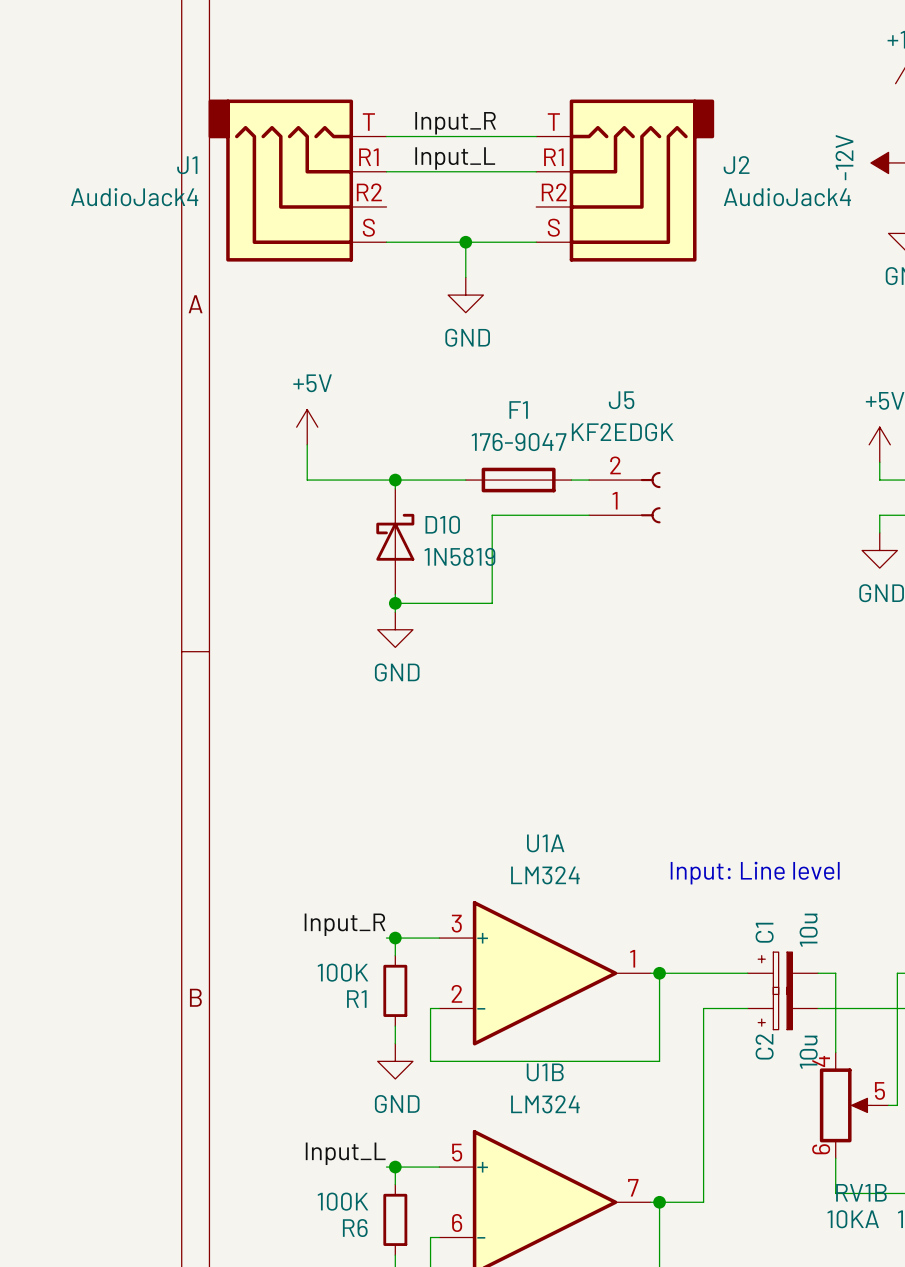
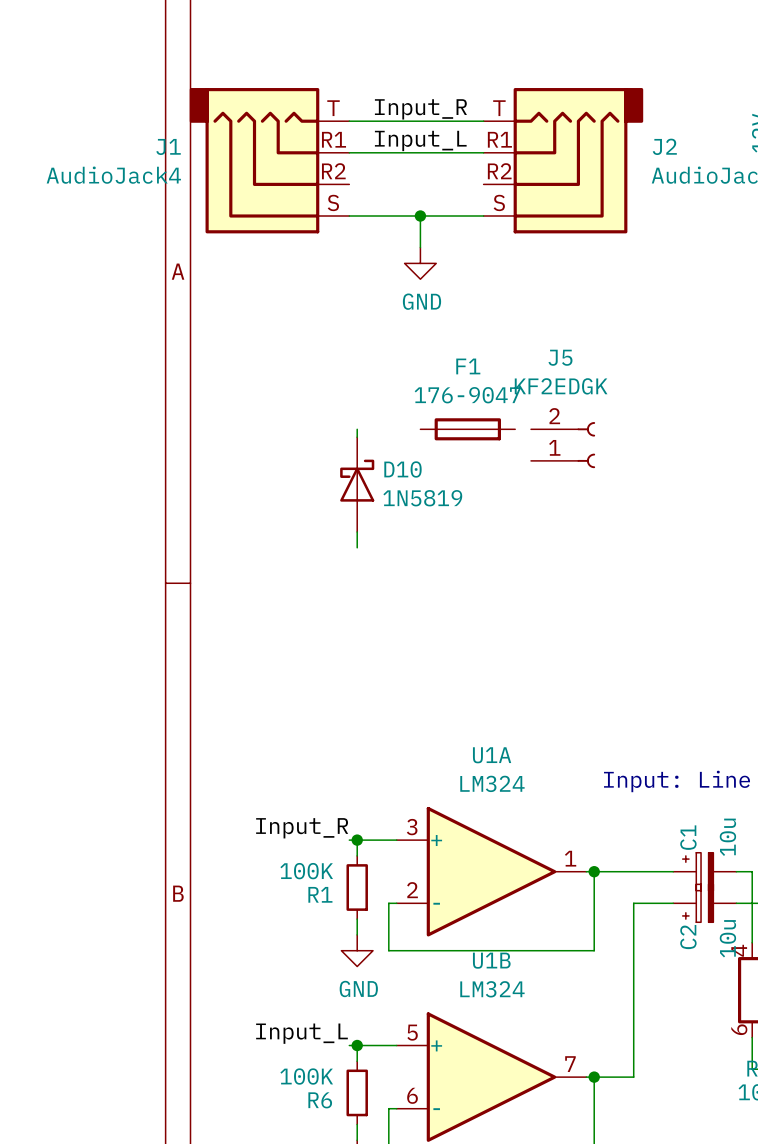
power symbol: +5V (307, 427) -> none
wire: (307, 444) (307, 480) (465, 480) -> none
junction: (395, 480) -> none
wire: (571, 480) (589, 480) -> none
wire: (589, 515) (492, 515) (492, 603) (395, 603) -> none
junction: (395, 603) -> none
power symbol: GND (395, 629) -> none

